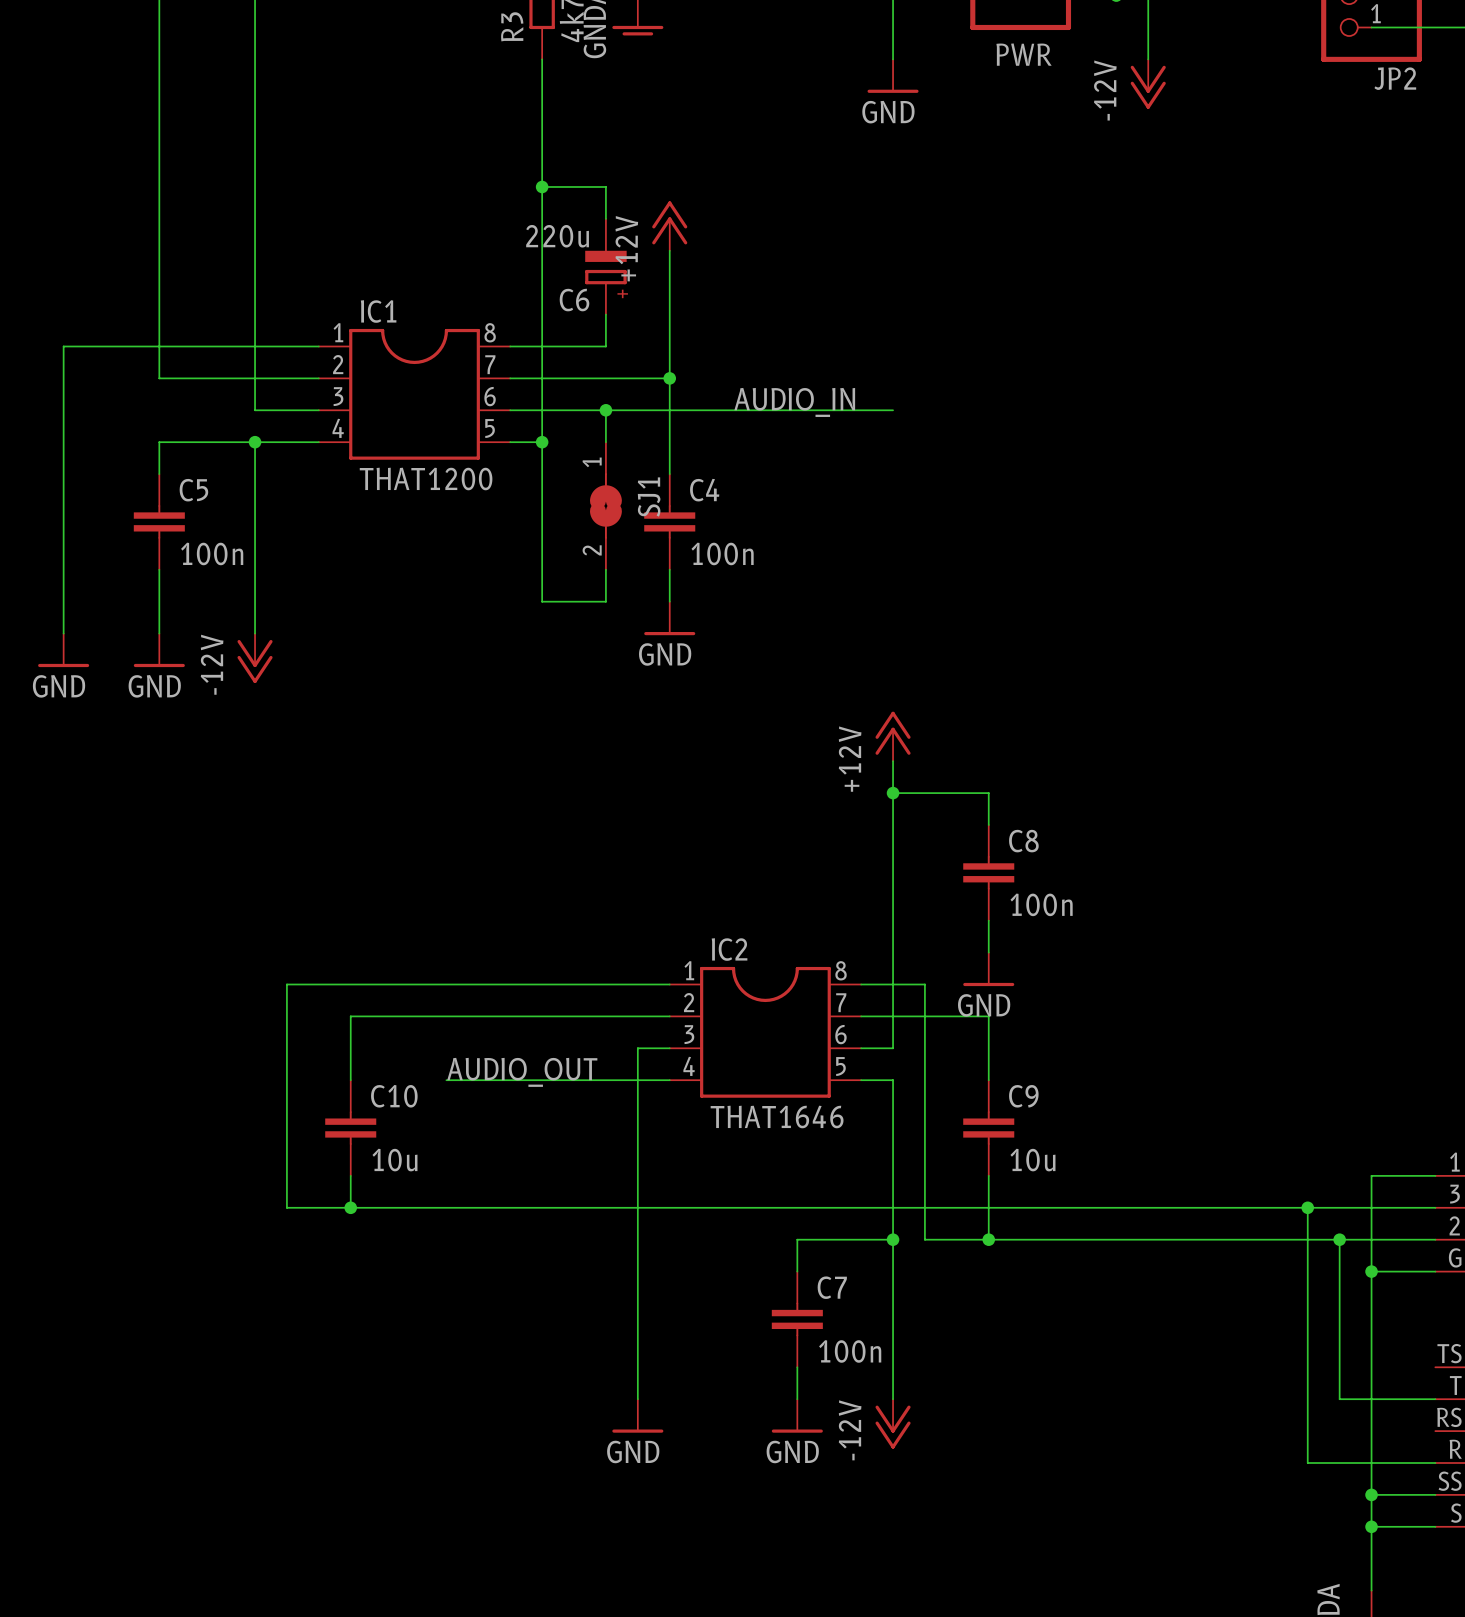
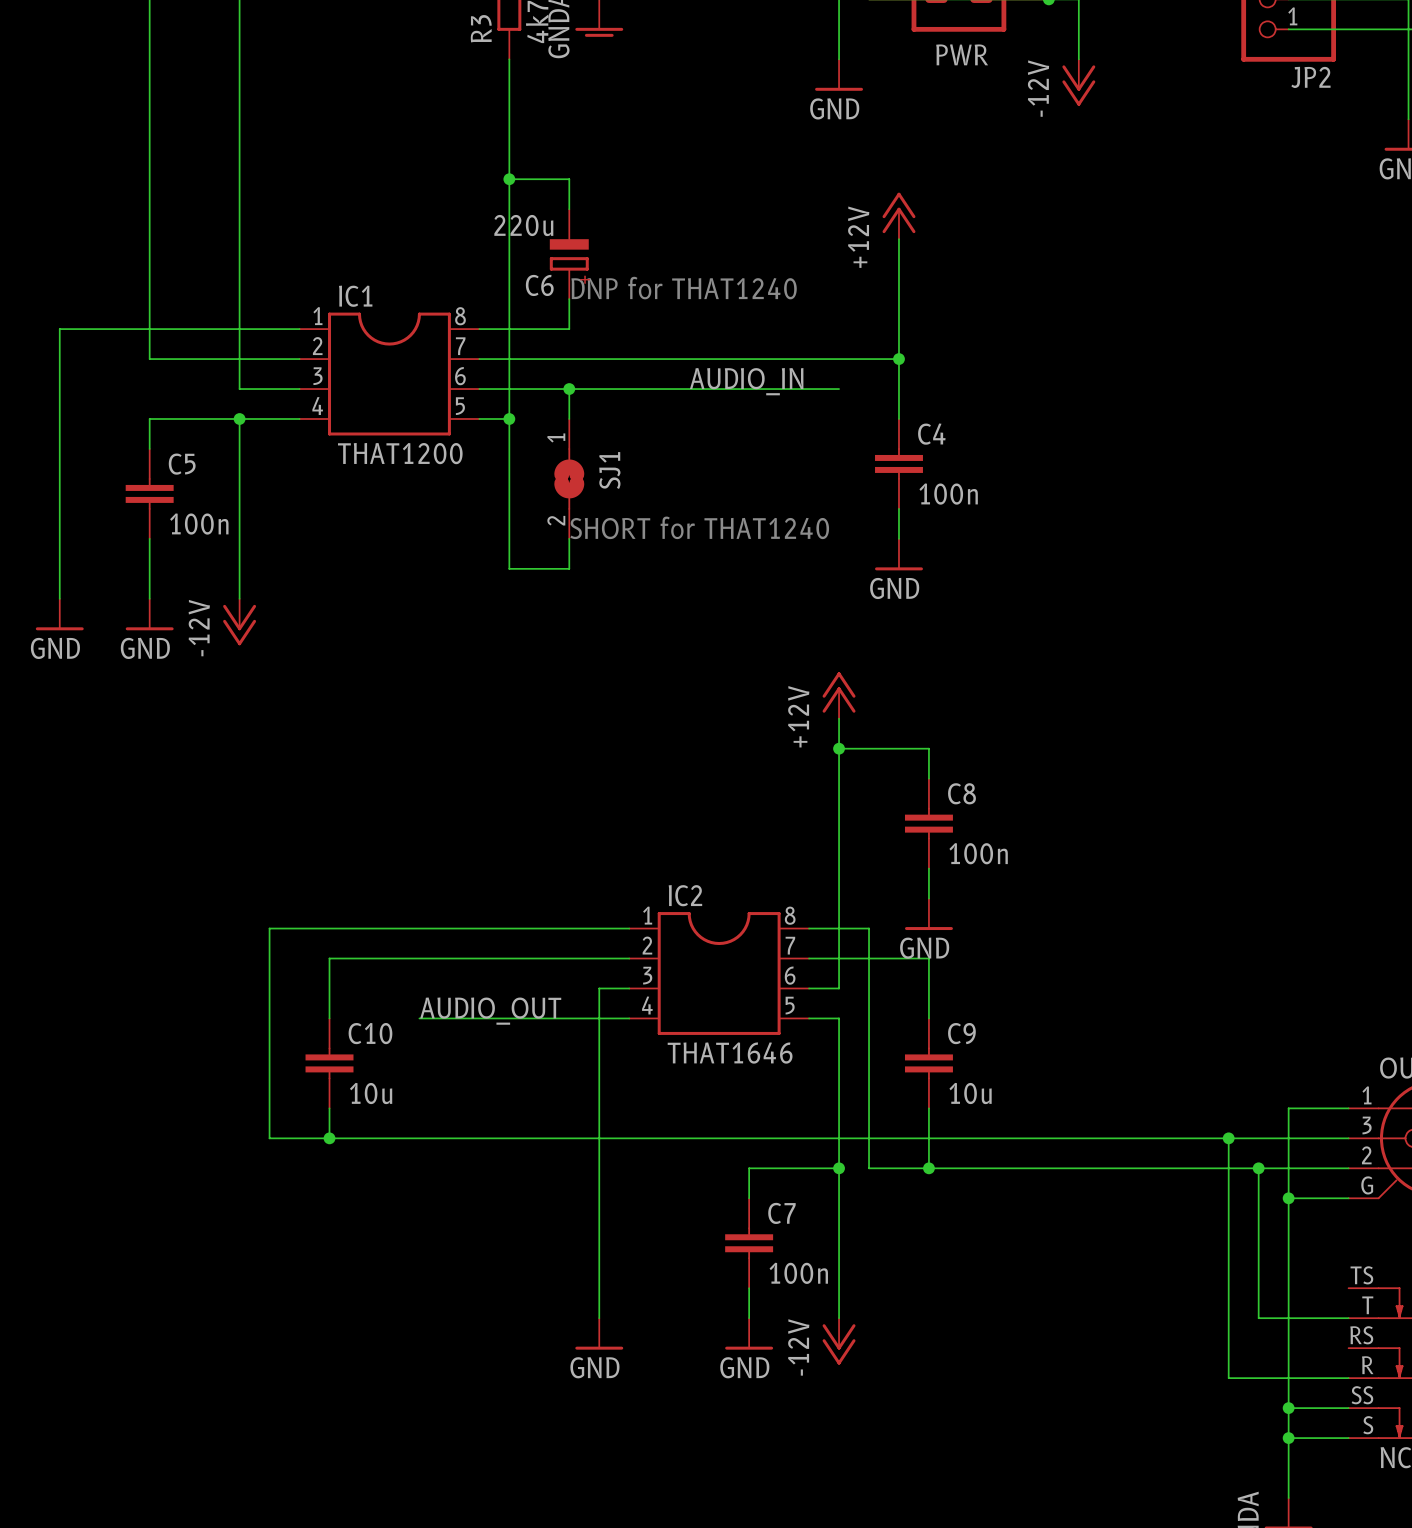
power symbol position: +12V (669, 226) -> +12V (898, 215)
wire: (669, 250) (669, 474) -> none
wire: none -> (898, 239) (898, 419)
text: none -> DNP for THAT1240 (684, 288)
wire: none -> (629, 359) (898, 359)
junction: (669, 378) -> none
junction: none -> (898, 359)
C4 position: (669, 521) -> (898, 463)
text: none -> SHORT for THAT1240 (699, 527)
wire: (669, 569) (669, 601) -> (898, 508) (898, 538)
power symbol position: GND (669, 618) -> GND (898, 554)

